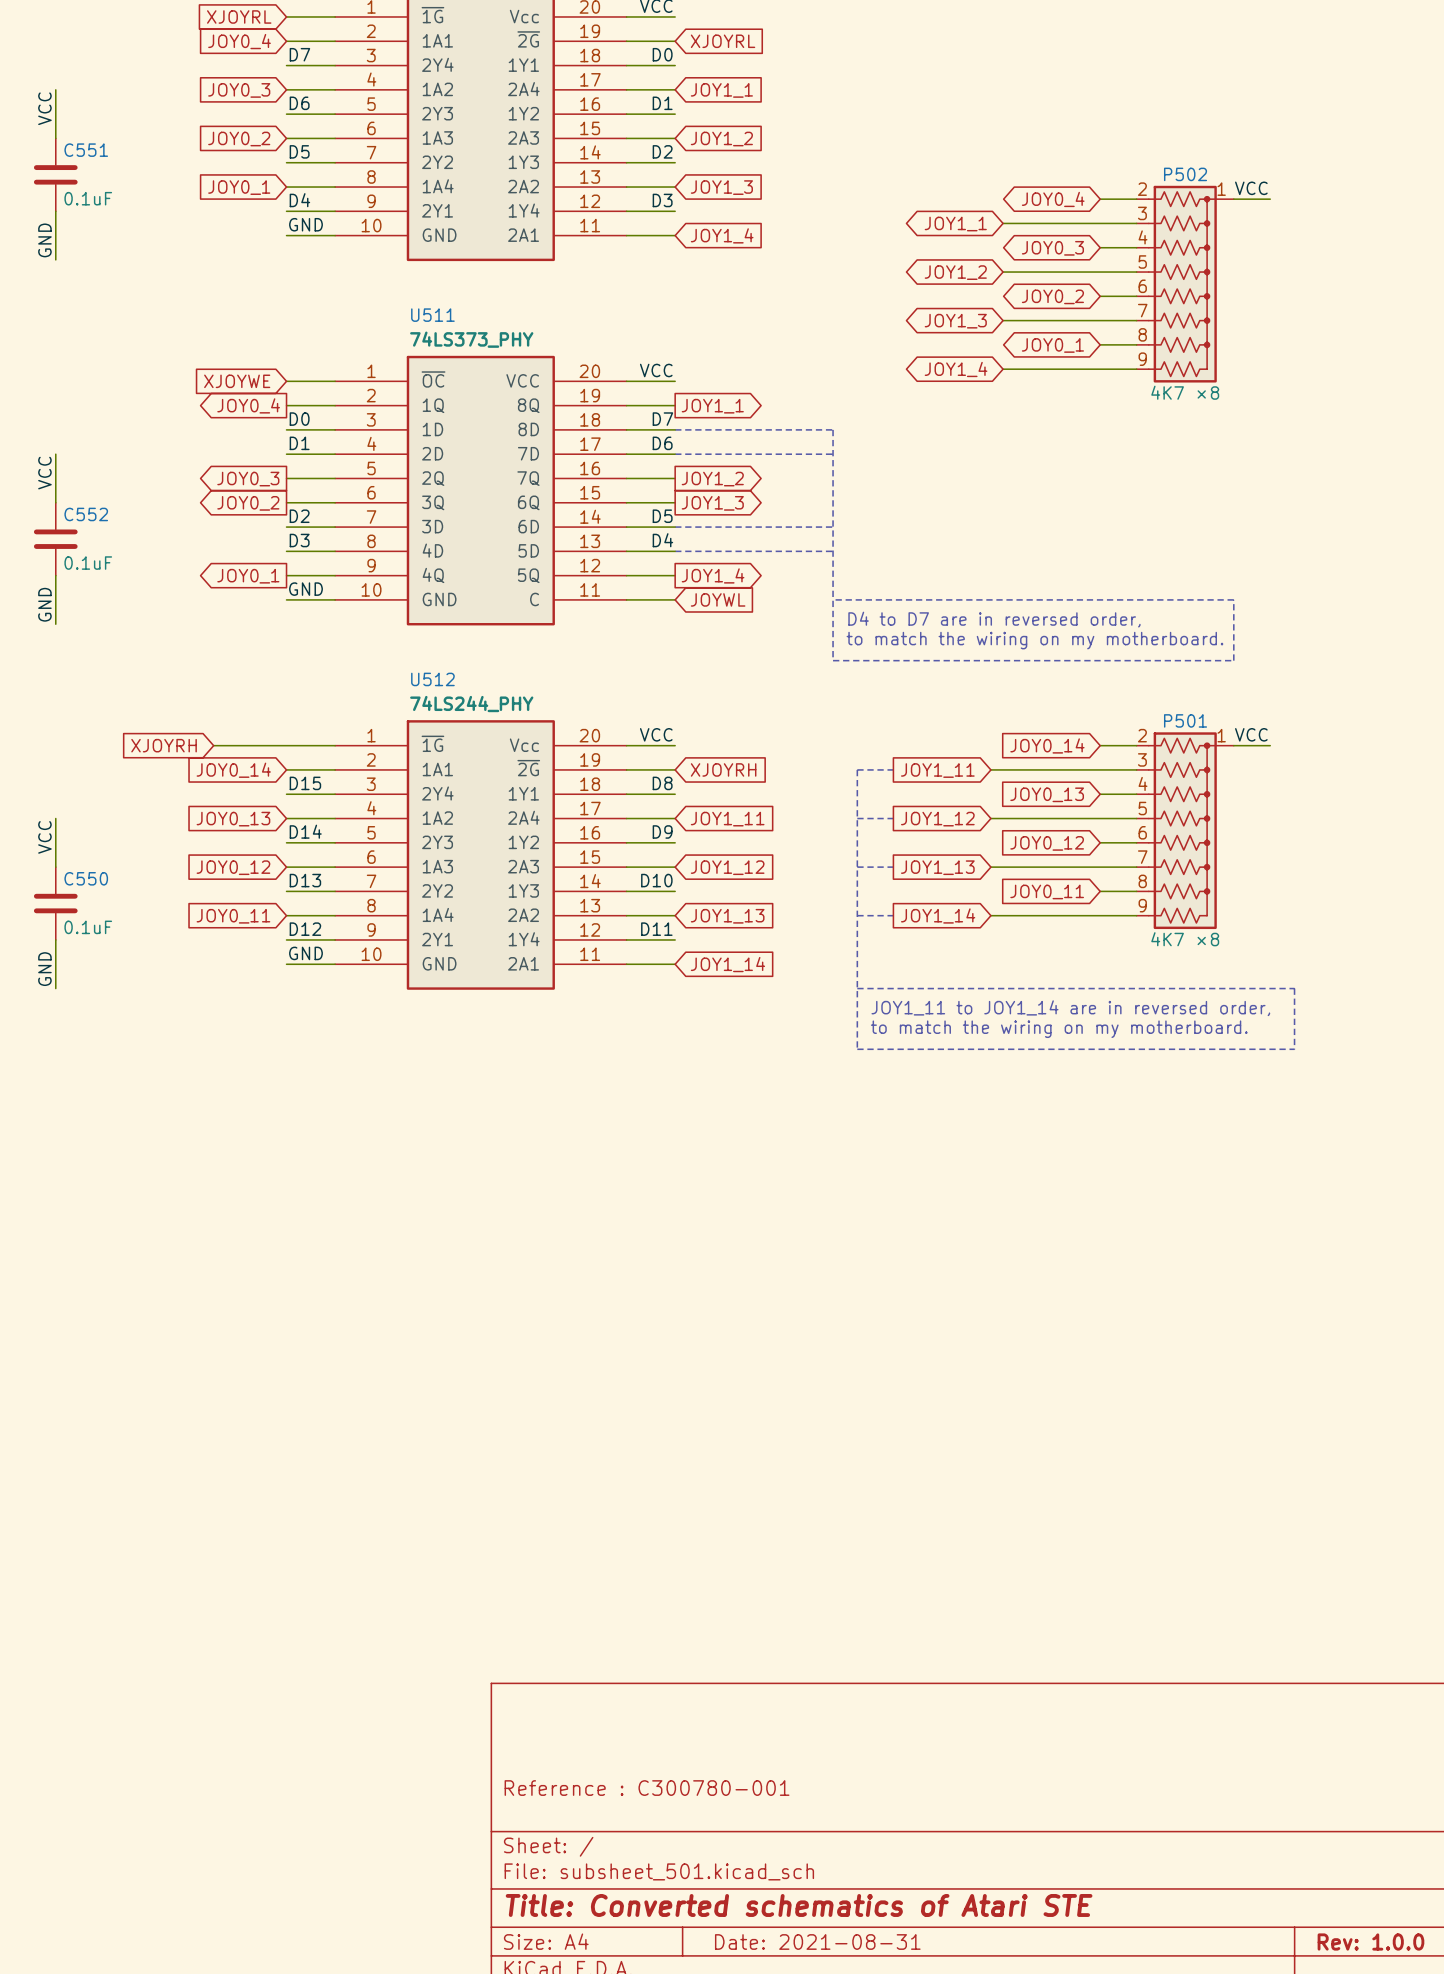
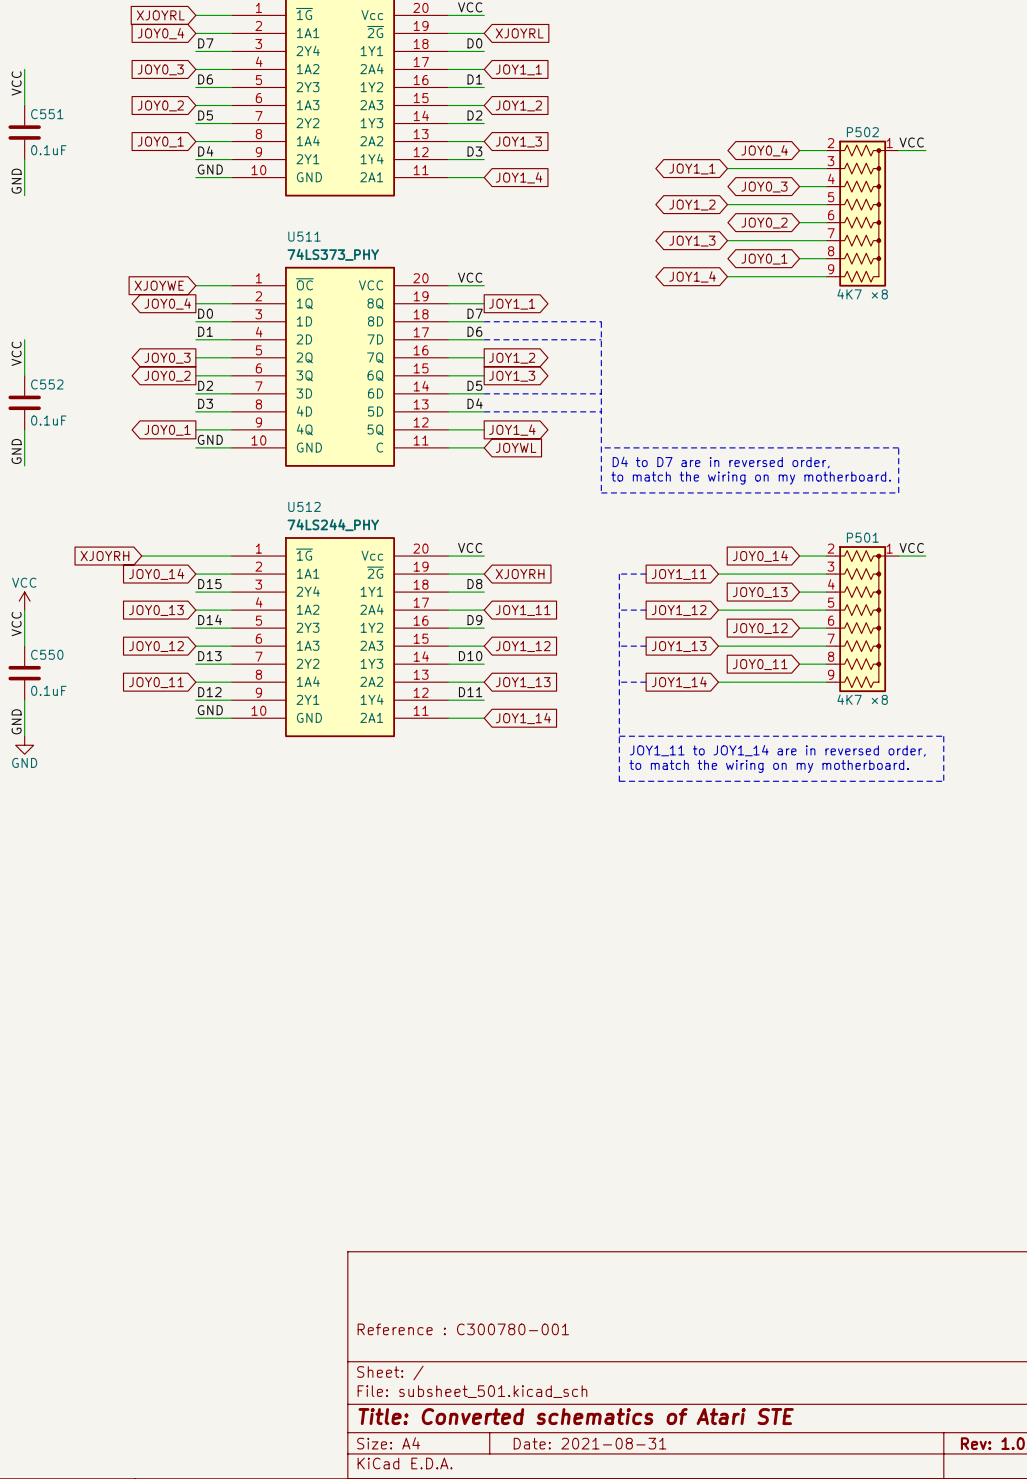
power symbol: none -> VCC (24, 601)
power symbol: none -> GND (24, 745)

